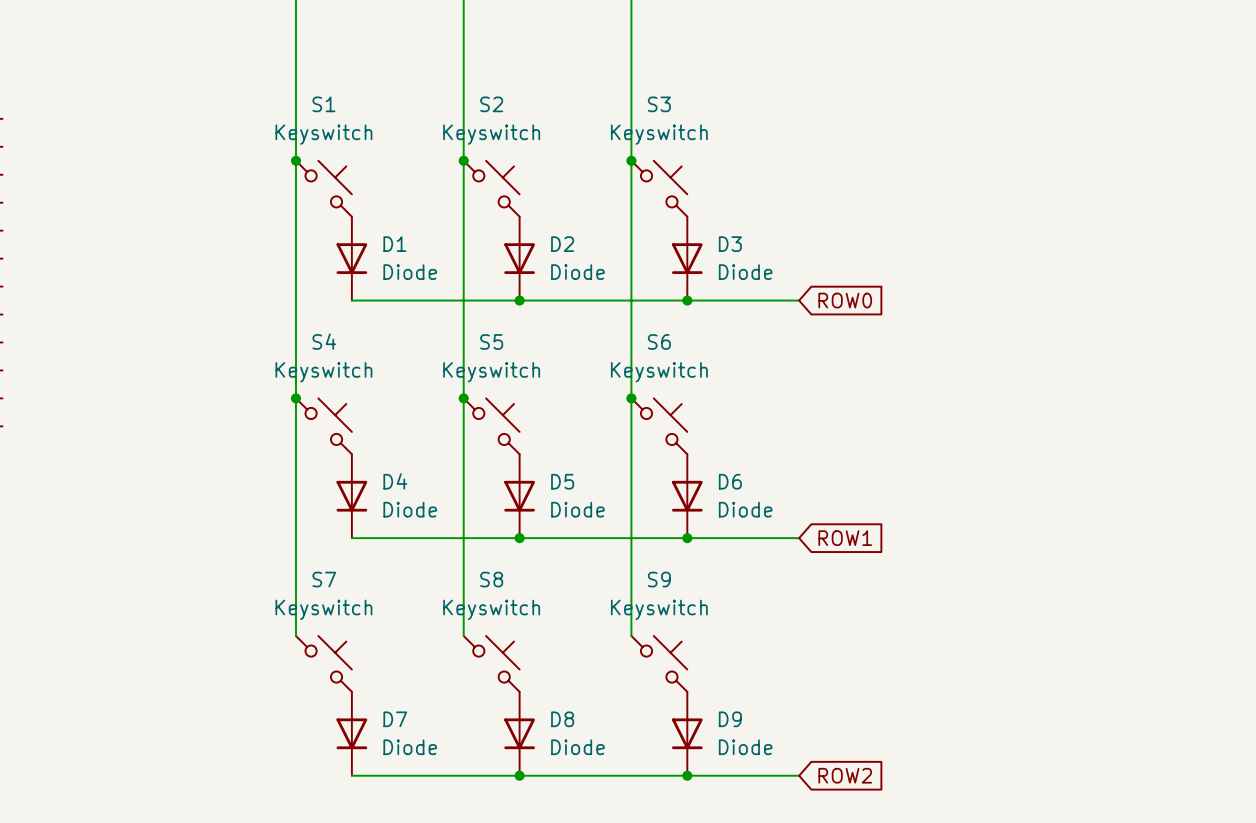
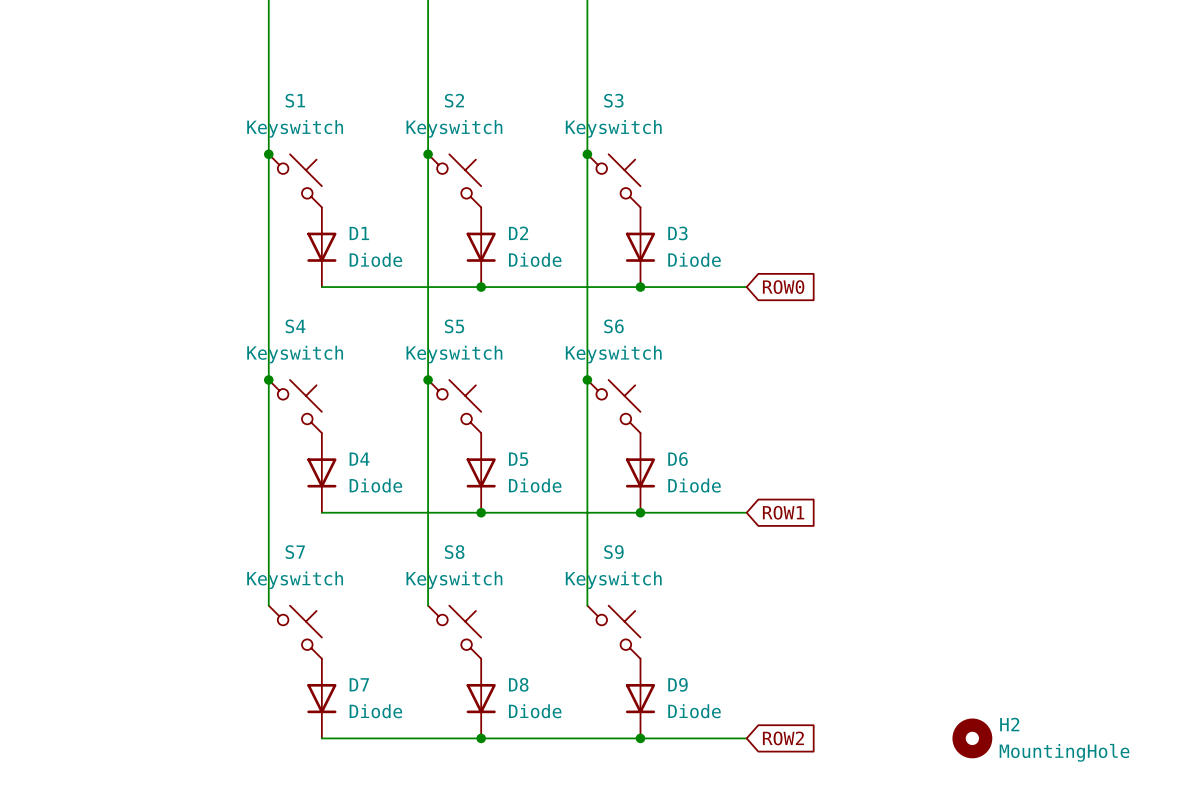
H2: none -> MountingHole (972, 738)

